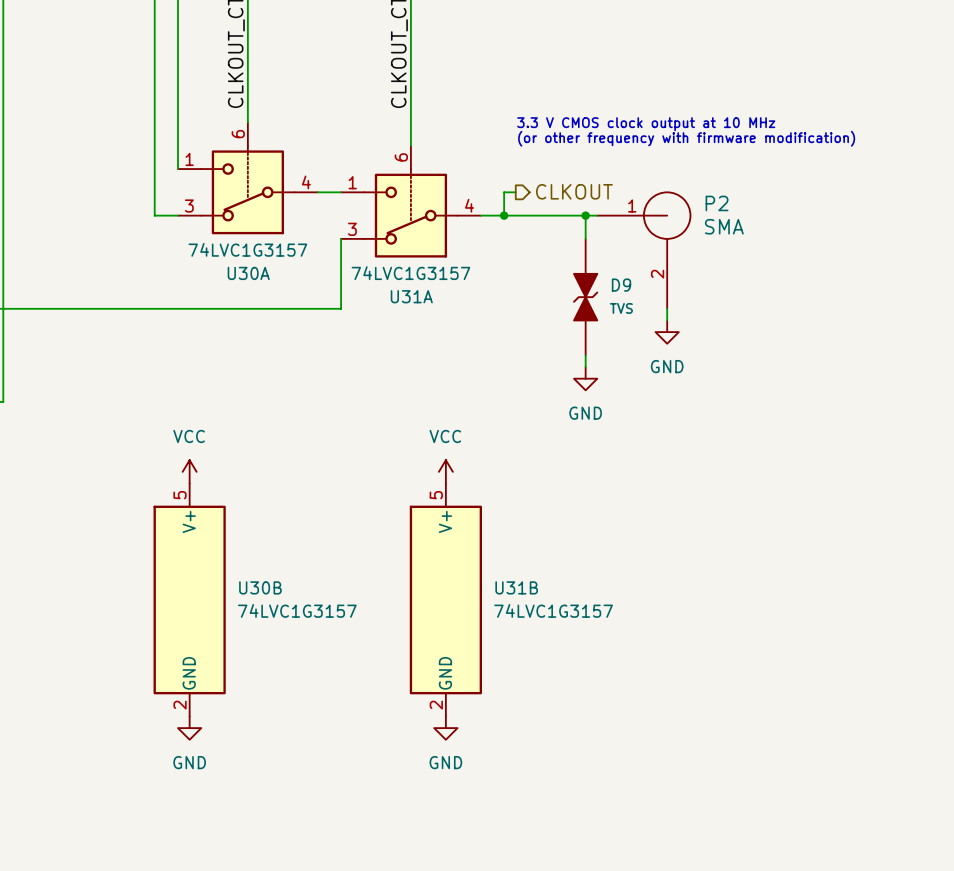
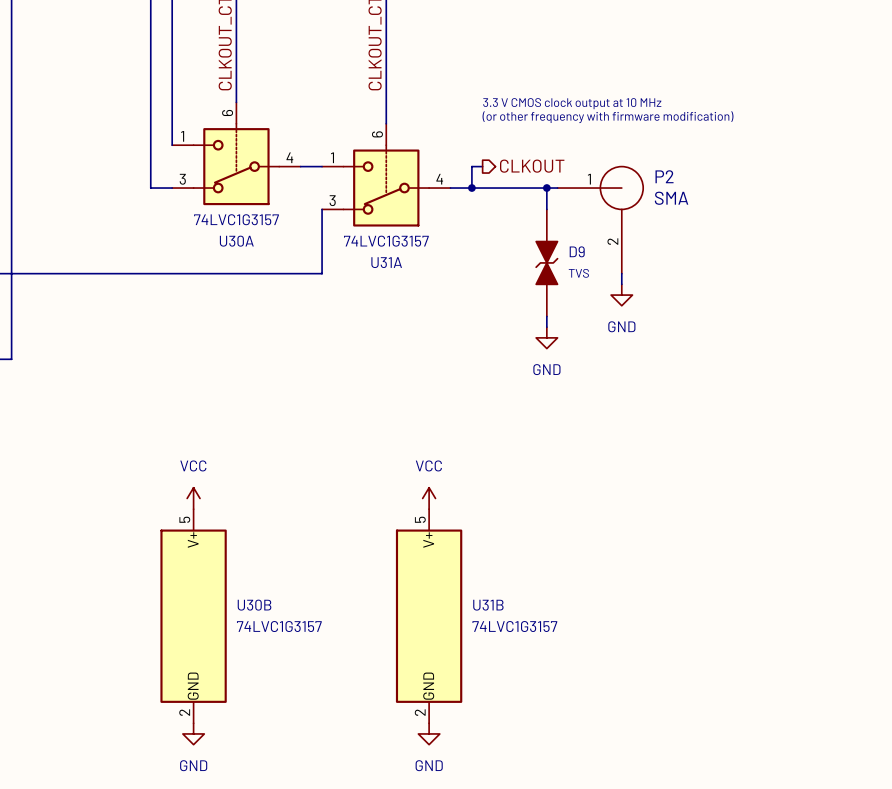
power symbol position: VCC (189, 471) -> VCC (193, 498)
power symbol position: VCC (445, 471) -> VCC (429, 498)
U30B position: (189, 599) -> (193, 616)
U31B position: (445, 599) -> (429, 616)
power symbol position: GND (189, 728) -> GND (193, 733)
power symbol position: GND (445, 728) -> GND (429, 733)

